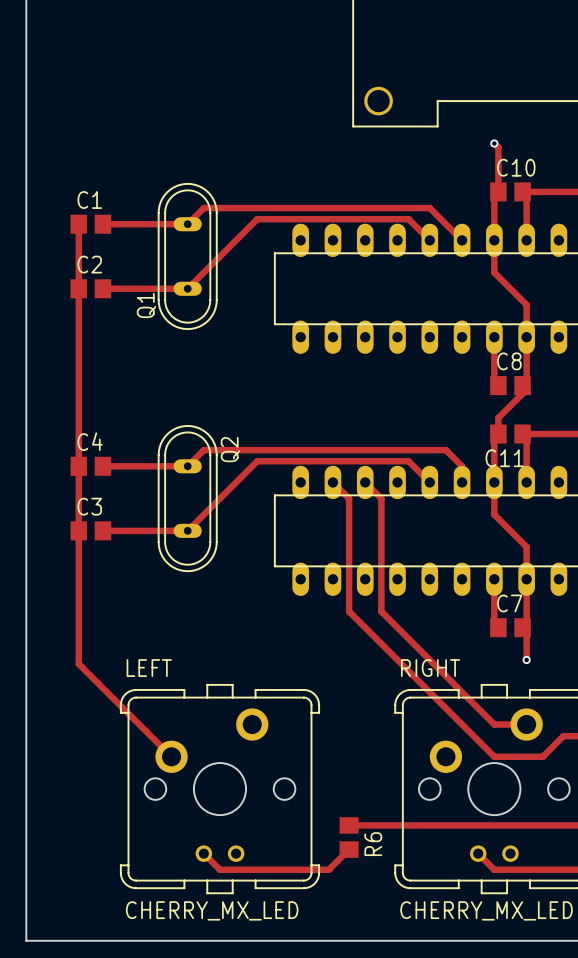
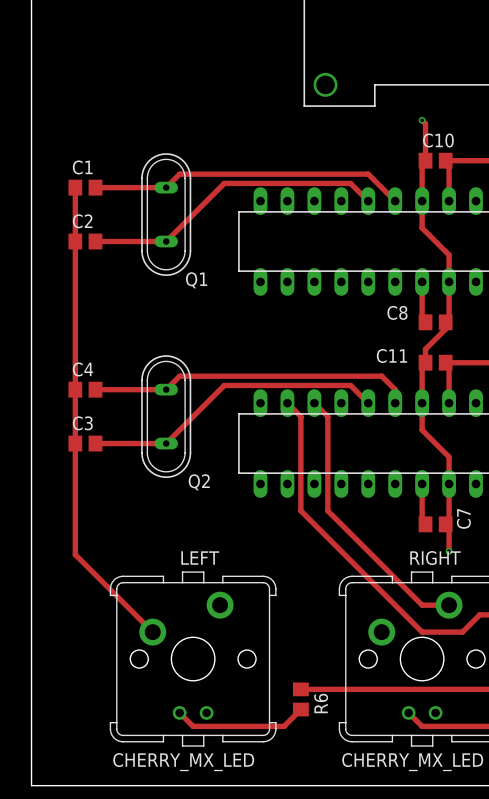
Q1 name rotation: 0° (146, 305) -> 90° clockwise (196, 280)
Q1 name position: Q1 (146, 305) -> Q1 (196, 280)
C8 name position: C8 (509, 361) -> C8 (397, 312)
Q2 name rotation: 0° (230, 449) -> 90° clockwise (199, 482)
Q2 name position: Q2 (230, 449) -> Q2 (199, 482)
C11 name position: C11 (504, 458) -> C11 (391, 356)
C7 name rotation: 0° (509, 603) -> 90° counterclockwise (463, 518)
LEFT name position: LEFT (149, 668) -> LEFT (200, 558)
RIGHT name position: RIGHT (430, 668) -> RIGHT (435, 558)

